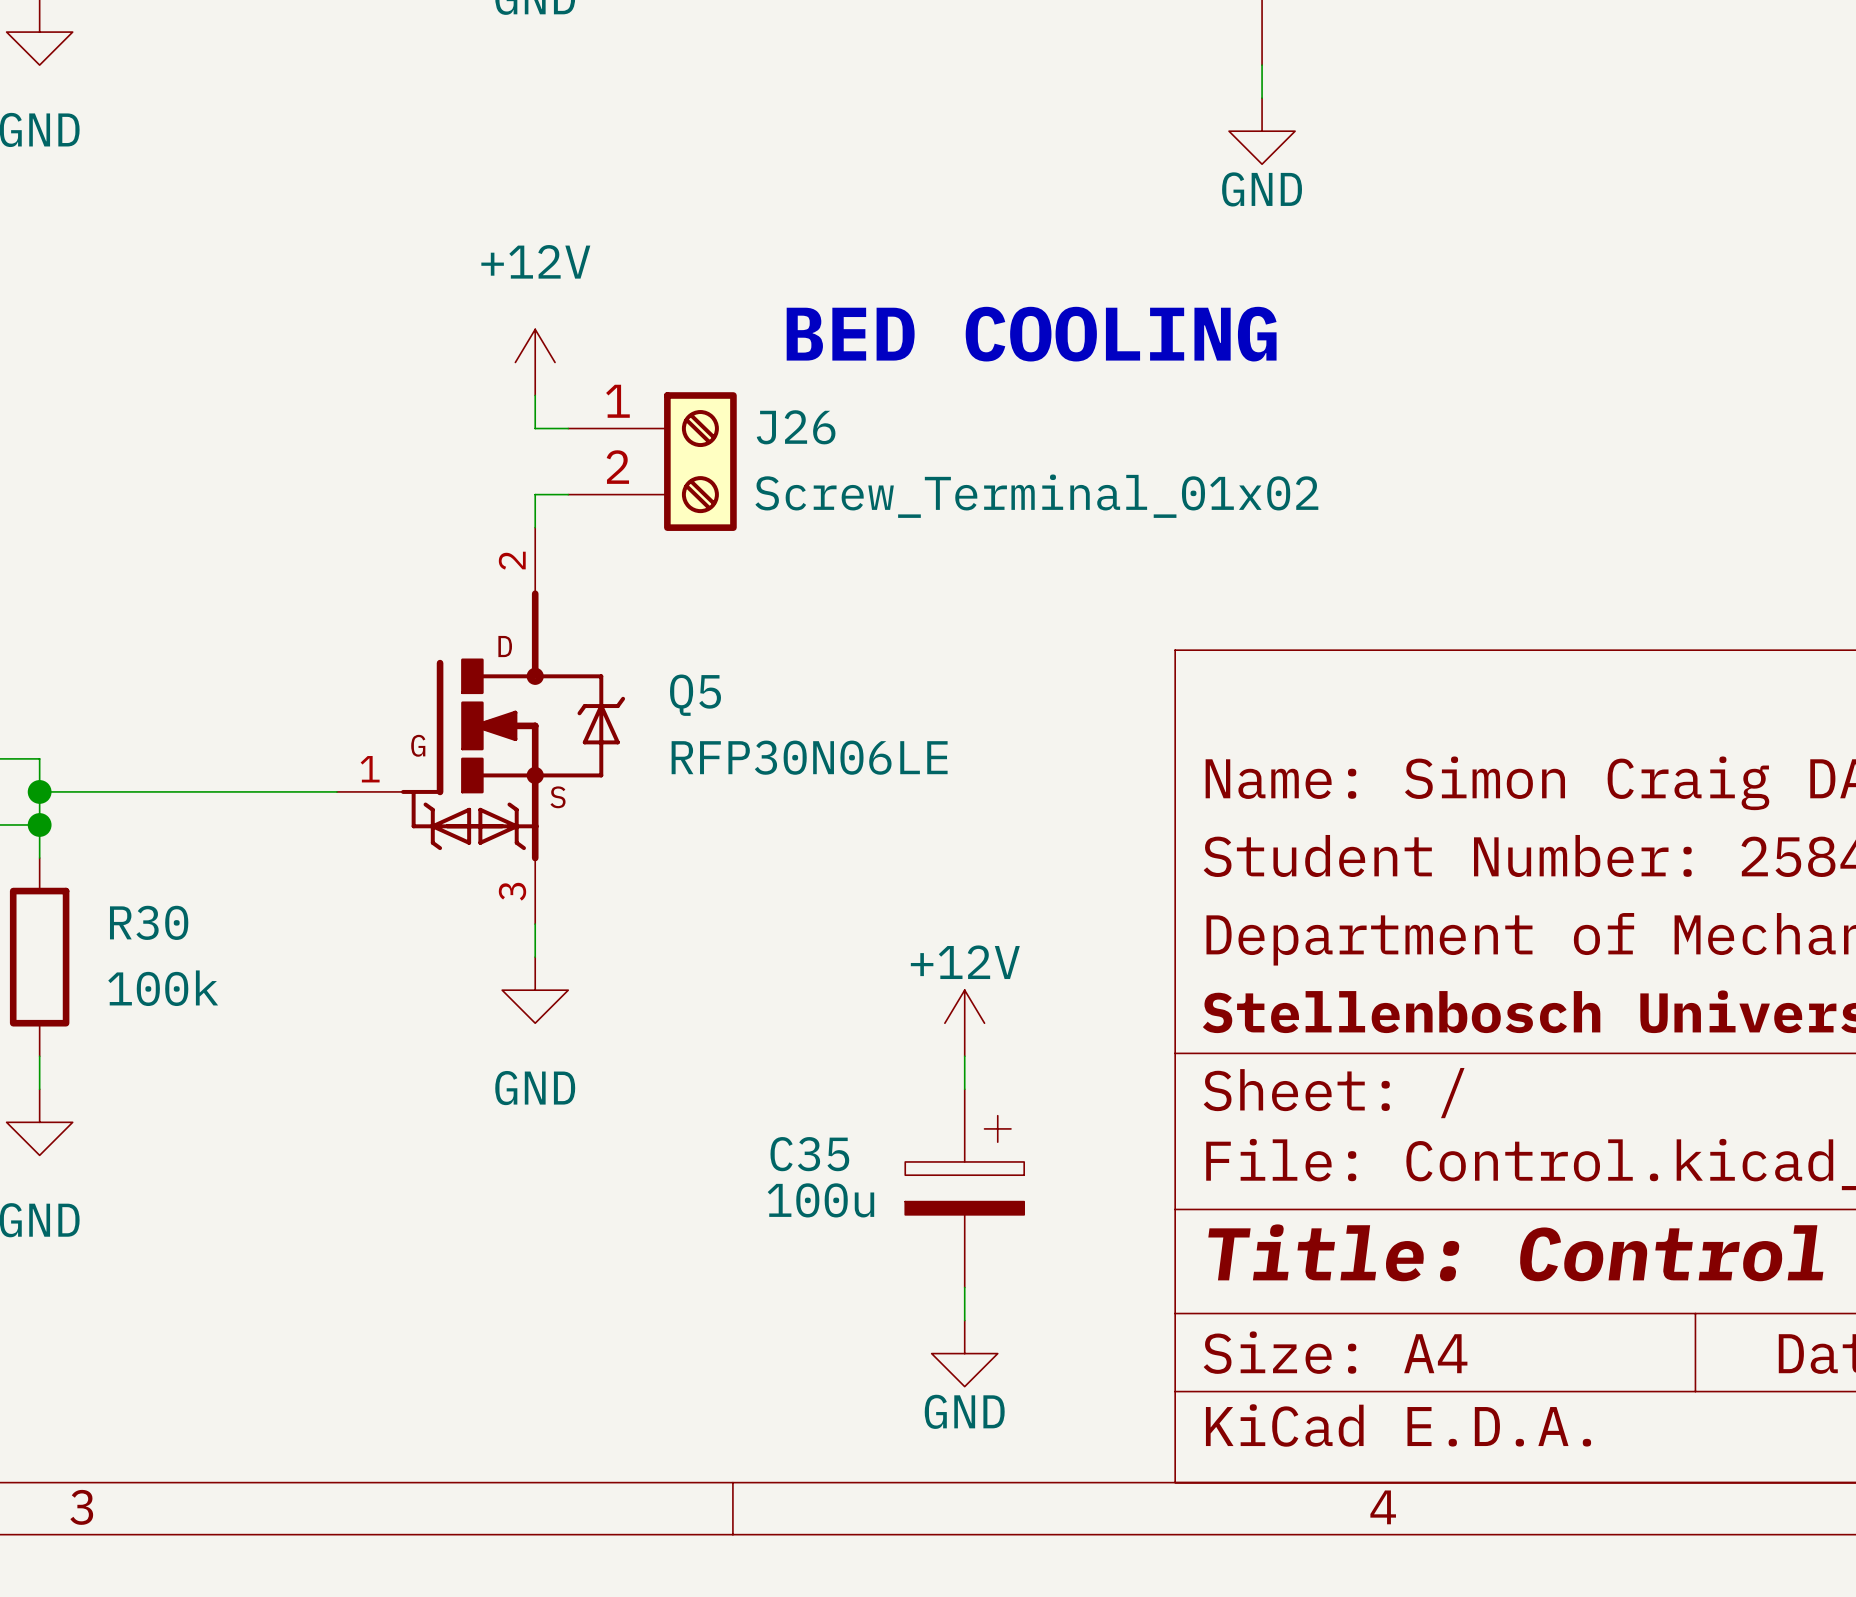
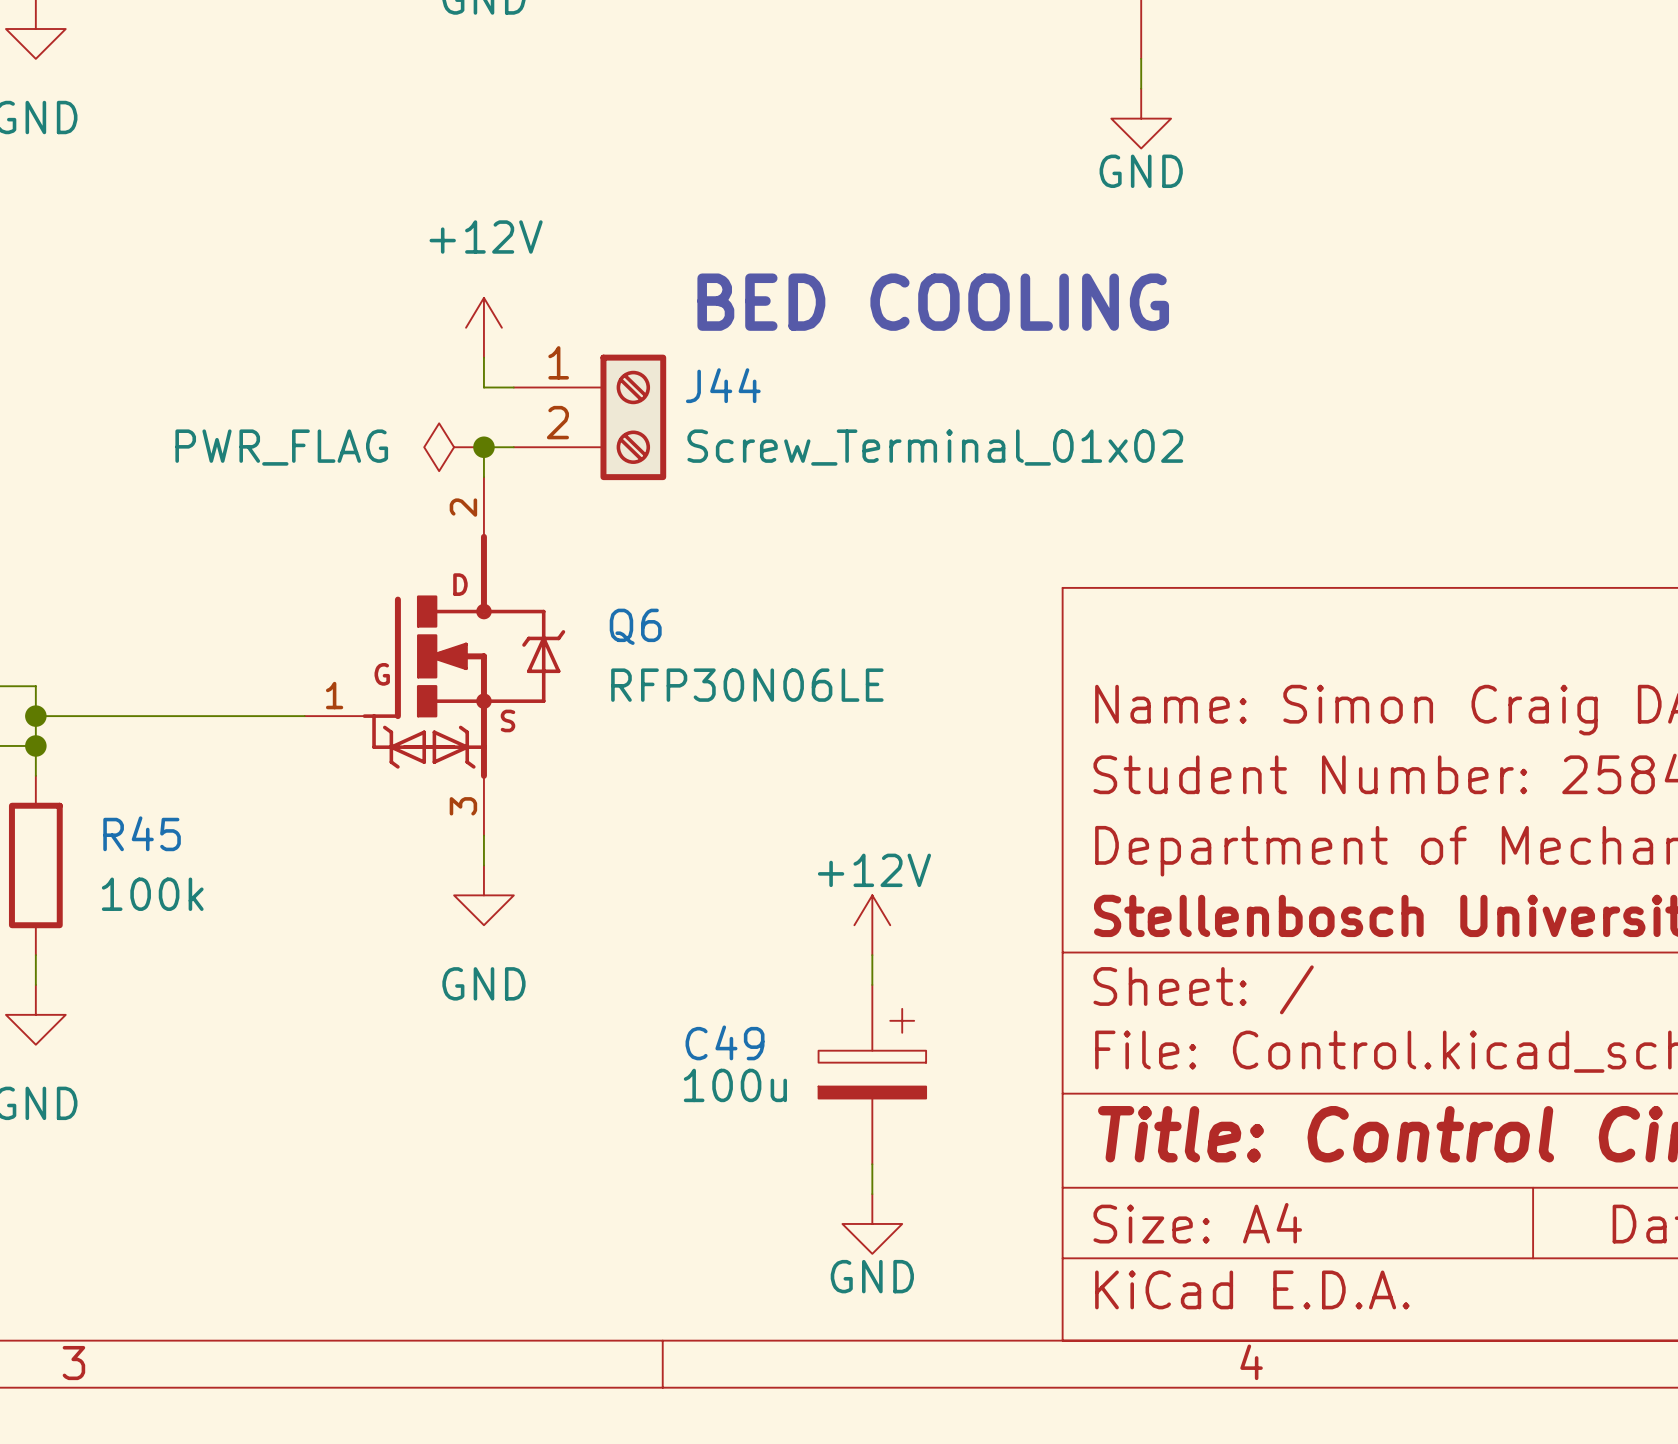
J26 name: J26 (796, 427) -> J44 (723, 385)
power symbol: none -> PWR_FLAG (454, 447)
junction: none -> (483, 447)
Q5 name: Q5 (695, 695) -> Q6 (635, 626)
R30 name: R30 (149, 922) -> R45 (142, 833)
C35 name: C35 (809, 1154) -> C49 (725, 1042)

